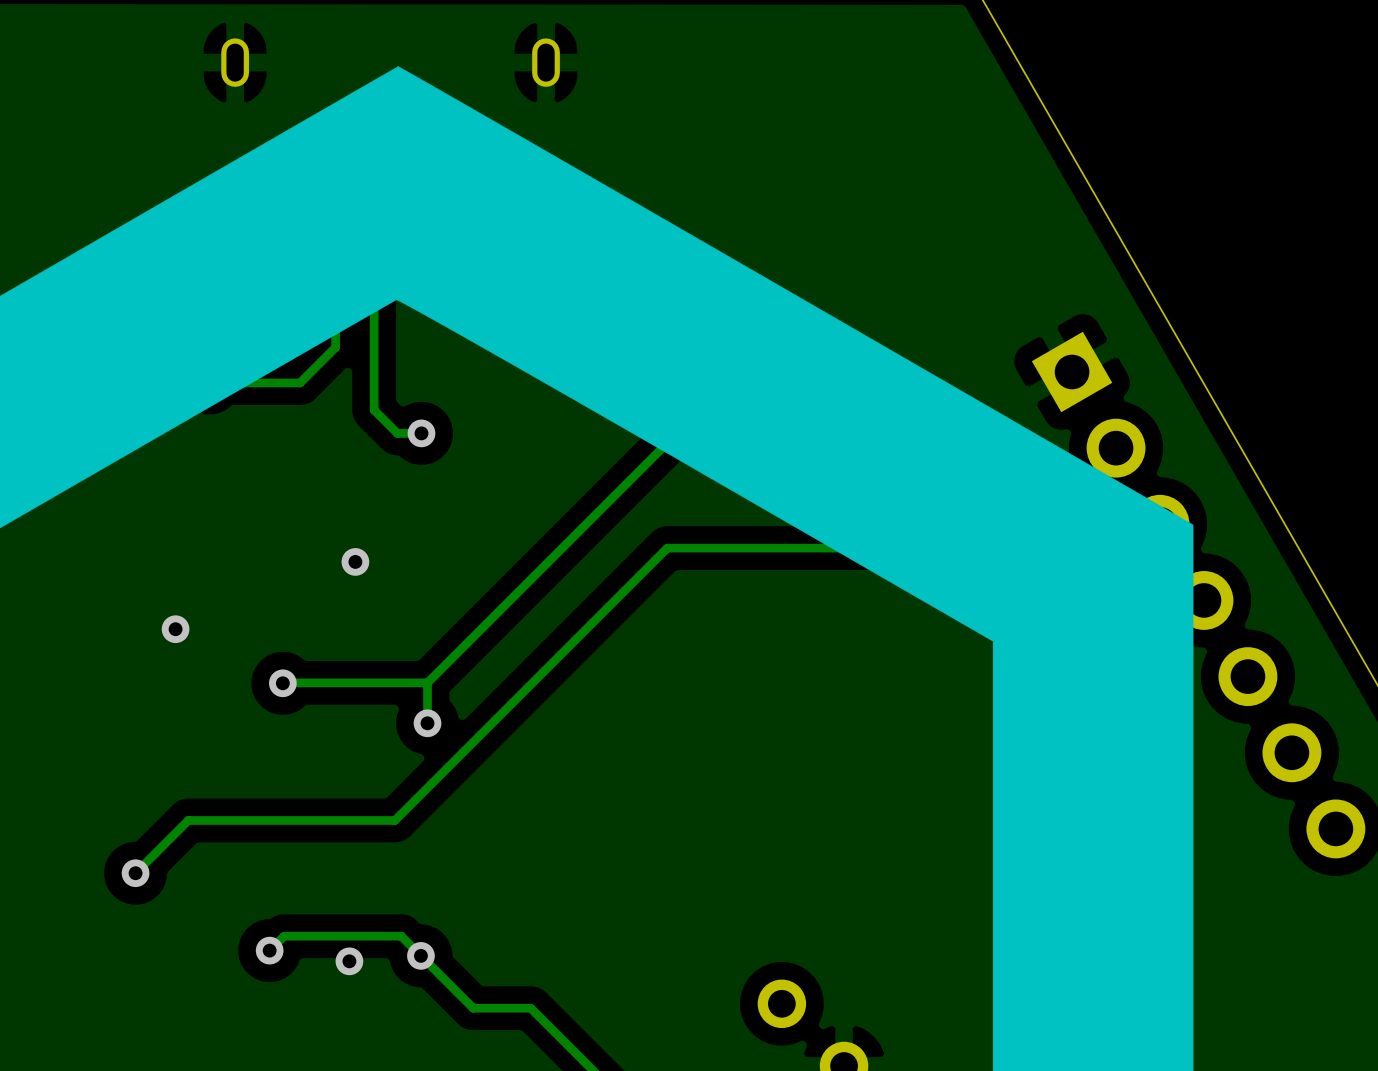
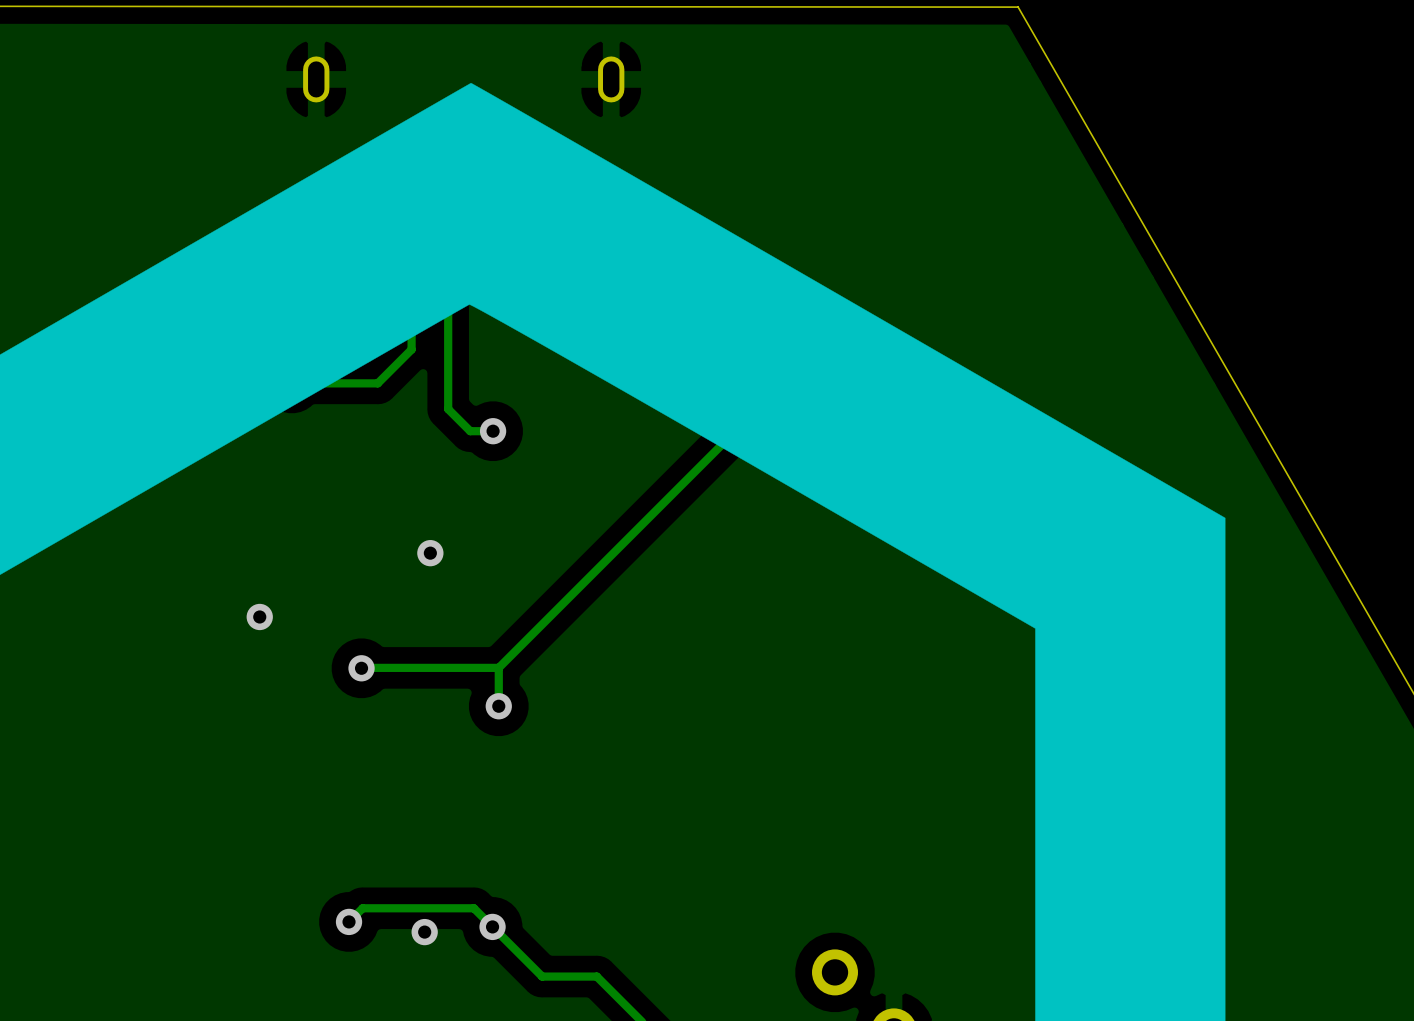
track: (945, 548) (667, 548) (394, 820) (188, 820) (135, 873) -> none
part: (1198, 595) -> none
via: (135, 873) -> none

